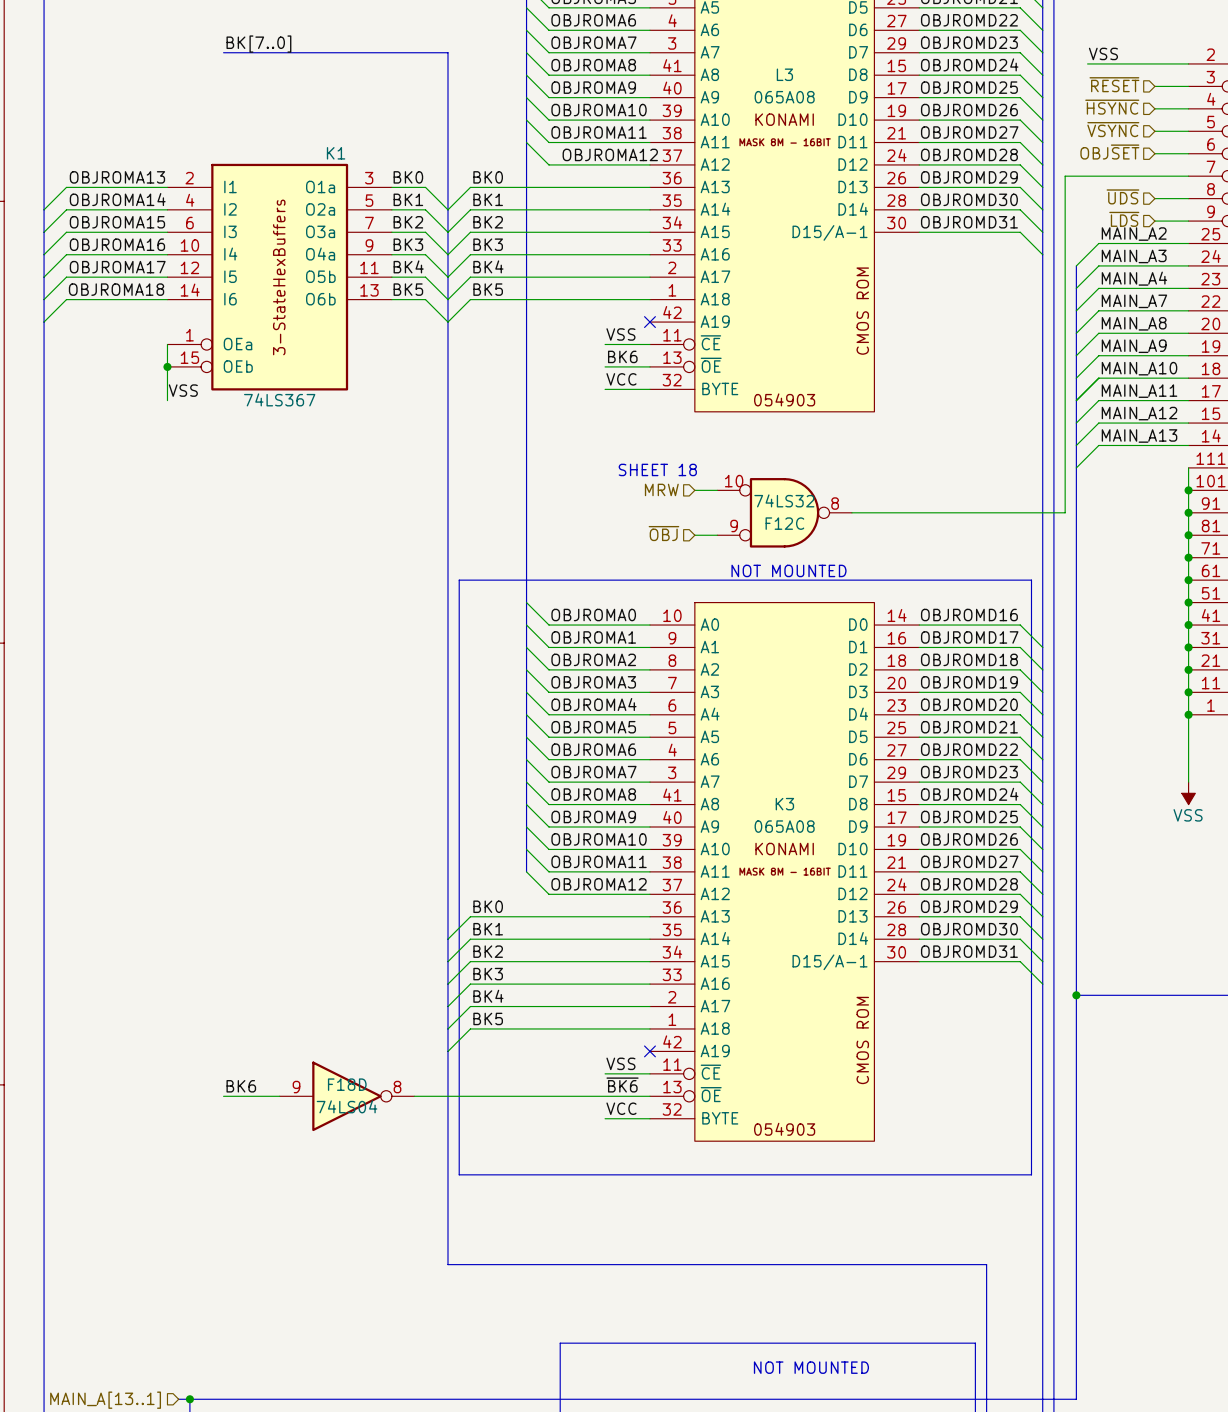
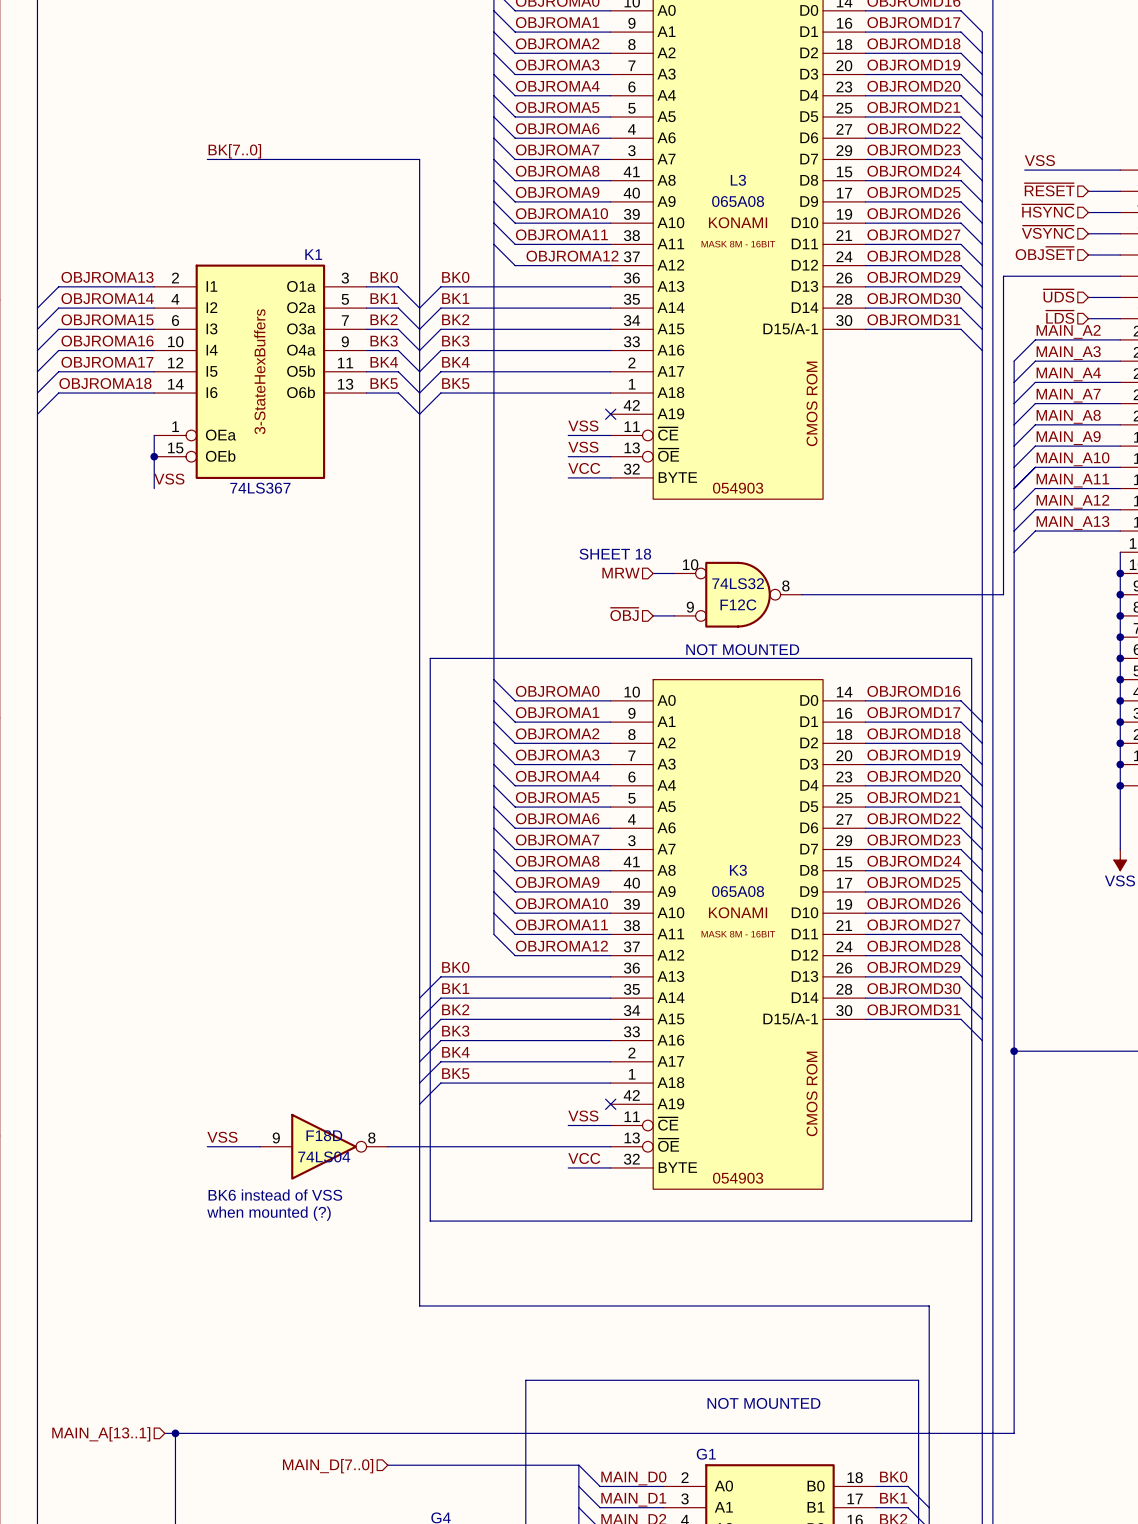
label: BK6 (622, 356) -> VSS (583, 447)
label: ~{BK6} (622, 1085) -> none
label: BK6 (241, 1086) -> VSS (222, 1137)
text: none -> BK6 instead of VSS (275, 1195)
text: none -> when mounted (?) (269, 1213)

